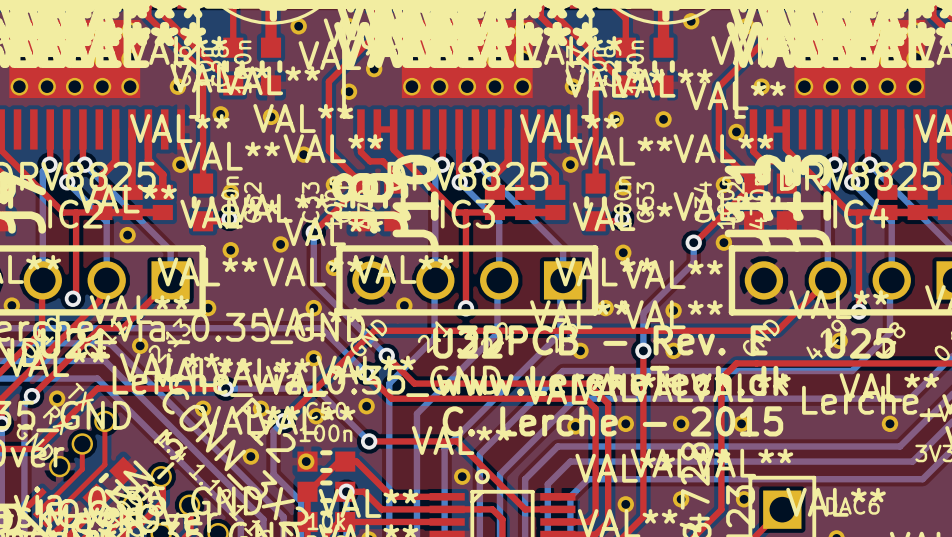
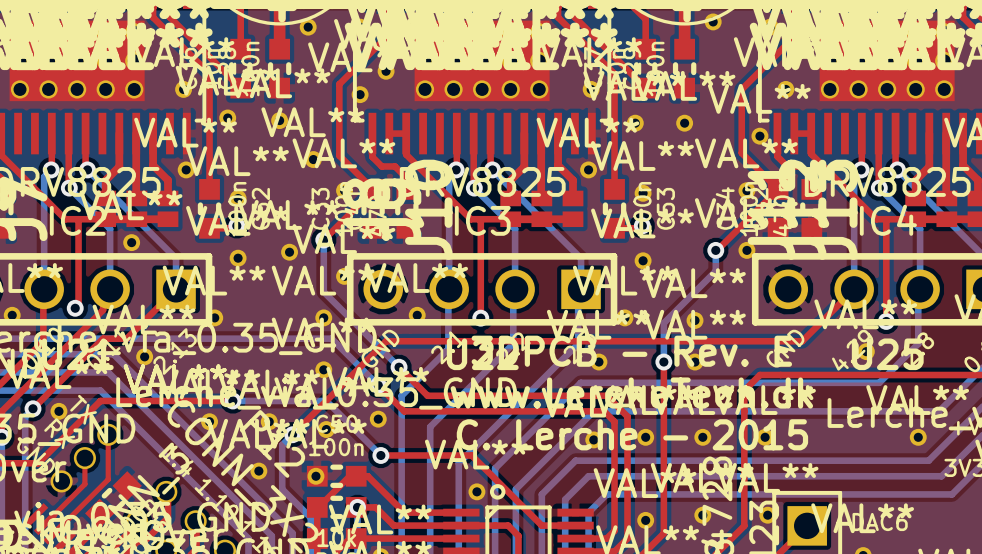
drawing: none -> [123, 364, 227, 395]

